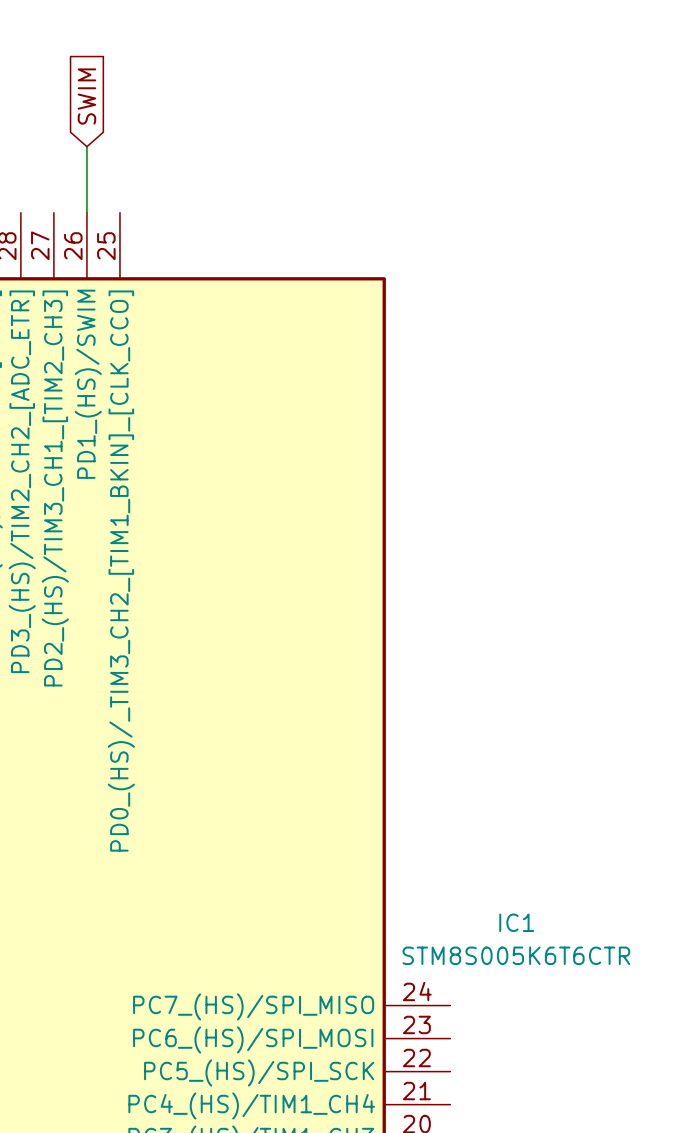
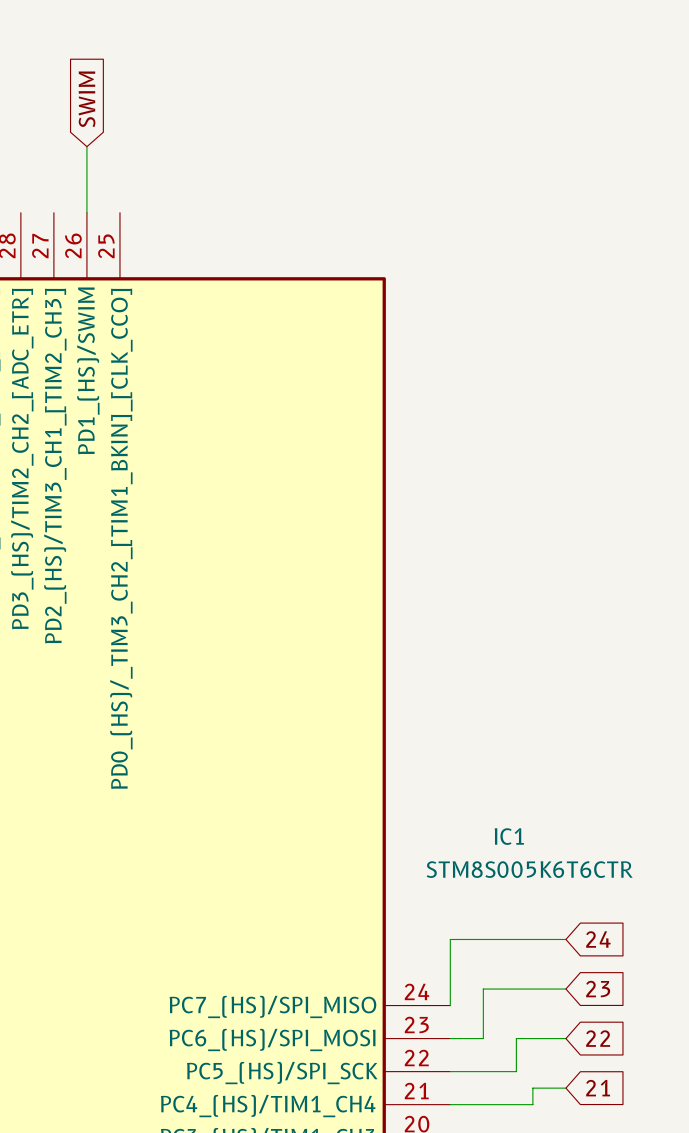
IC1 name position: IC1 (516, 922) -> IC1 (509, 836)
wire: none -> (565, 939) (450, 939) (450, 1005)
global label: none -> 24 (598, 939)
IC1 value position: STM8S005K6T6CTR (516, 955) -> STM8S005K6T6CTR (529, 869)
wire: none -> (565, 989) (483, 989) (483, 1038) (450, 1038)
global label: none -> 23 (598, 989)
wire: none -> (565, 1038) (516, 1038) (516, 1071) (450, 1071)
global label: none -> 22 (598, 1038)
wire: none -> (565, 1088) (532, 1088) (532, 1104) (450, 1104)
global label: none -> 21 (598, 1088)

